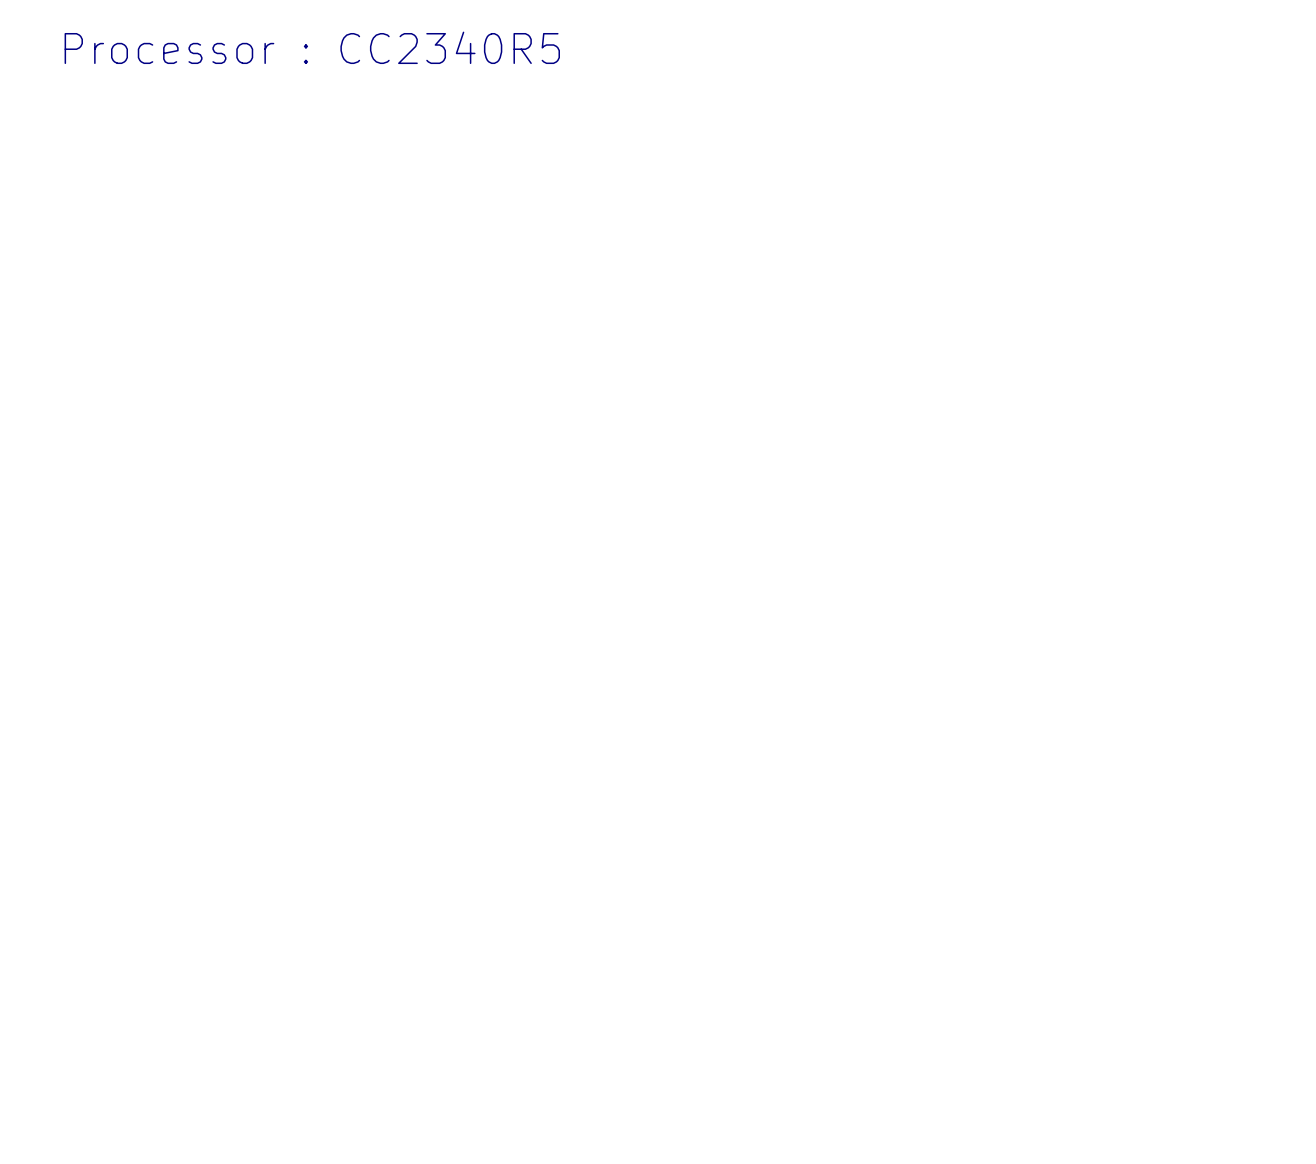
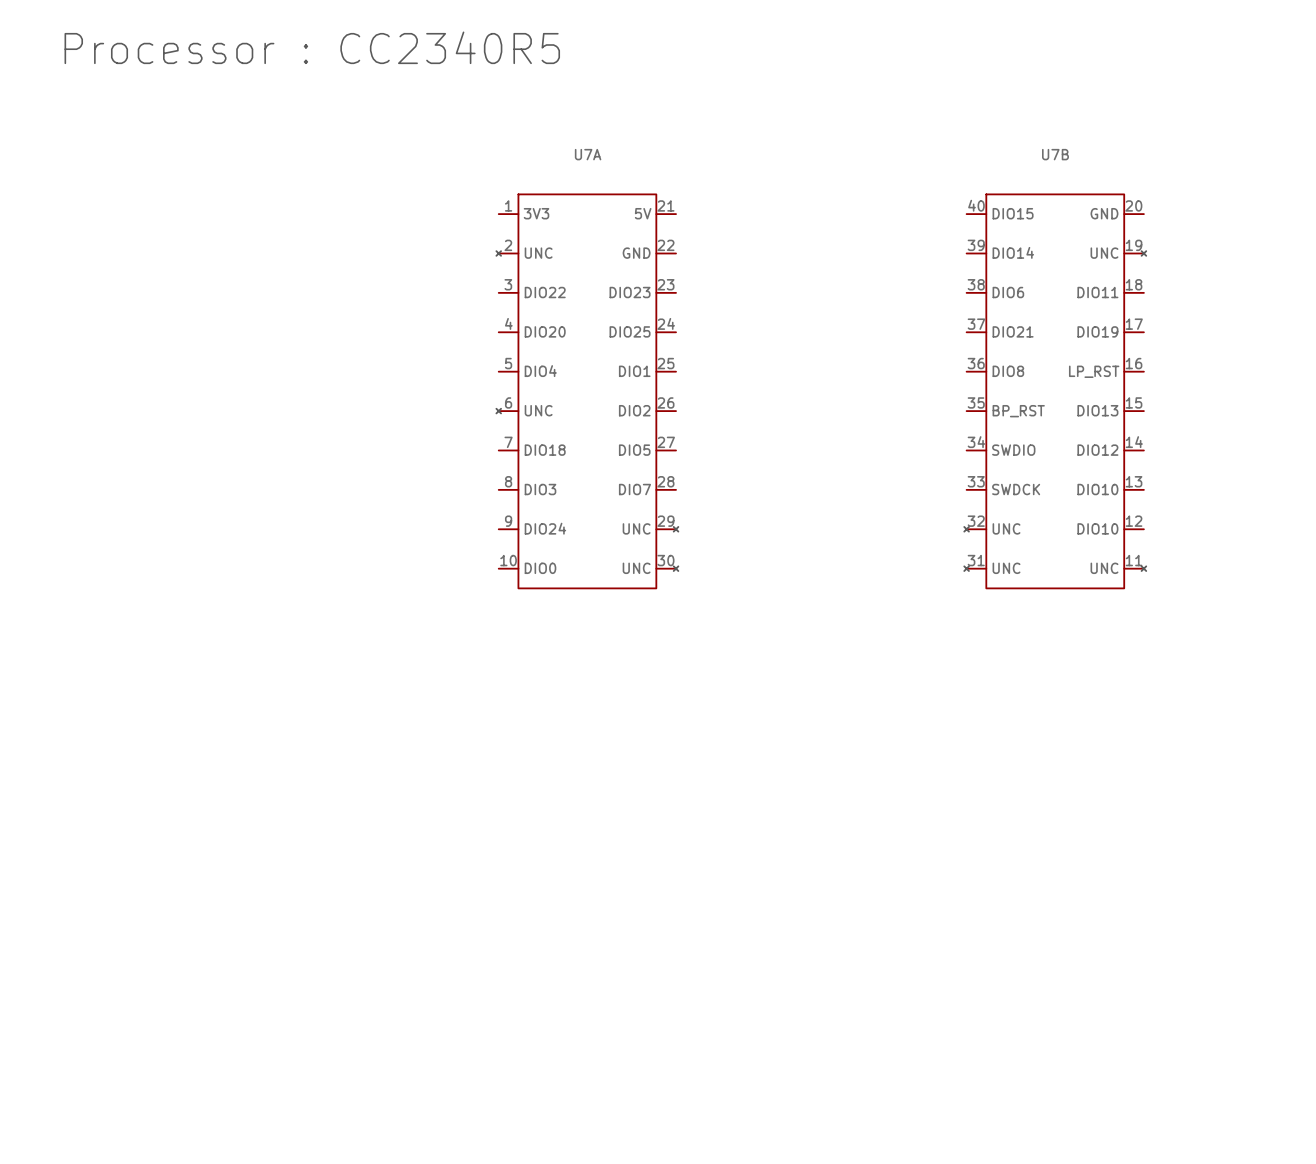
U7A: none -> (587, 391)
U7B: none -> (1055, 391)

